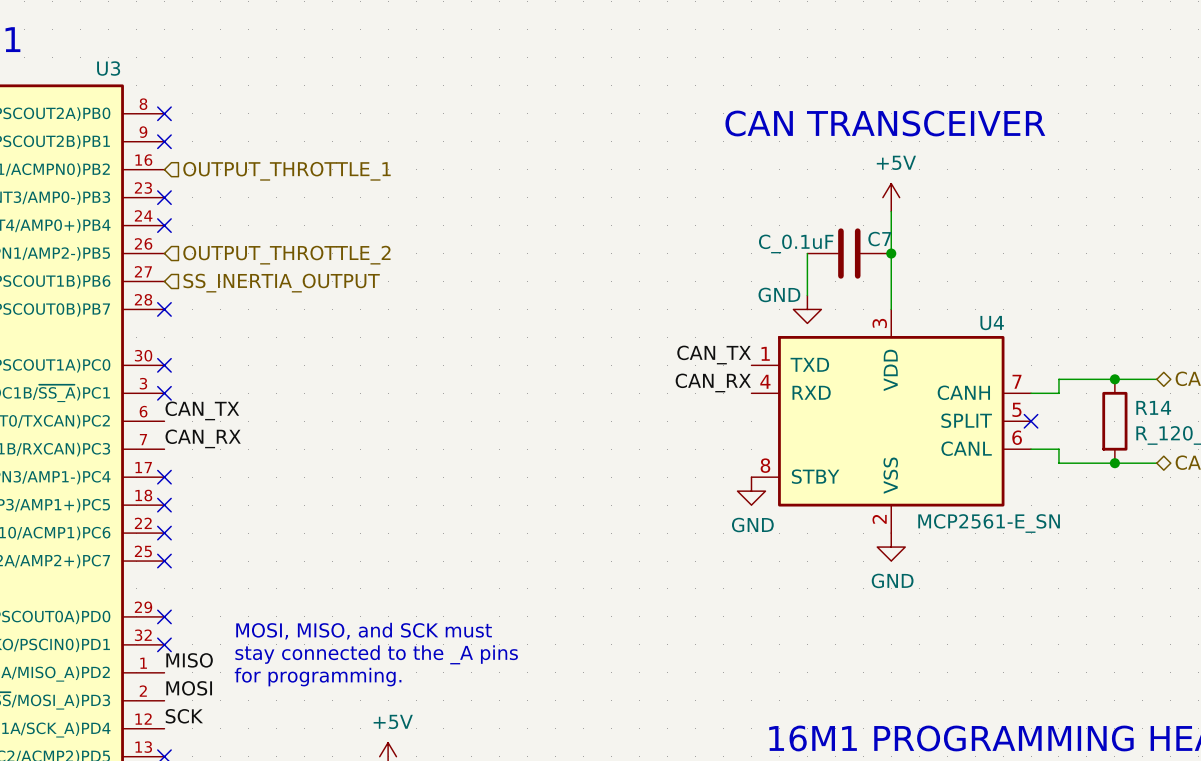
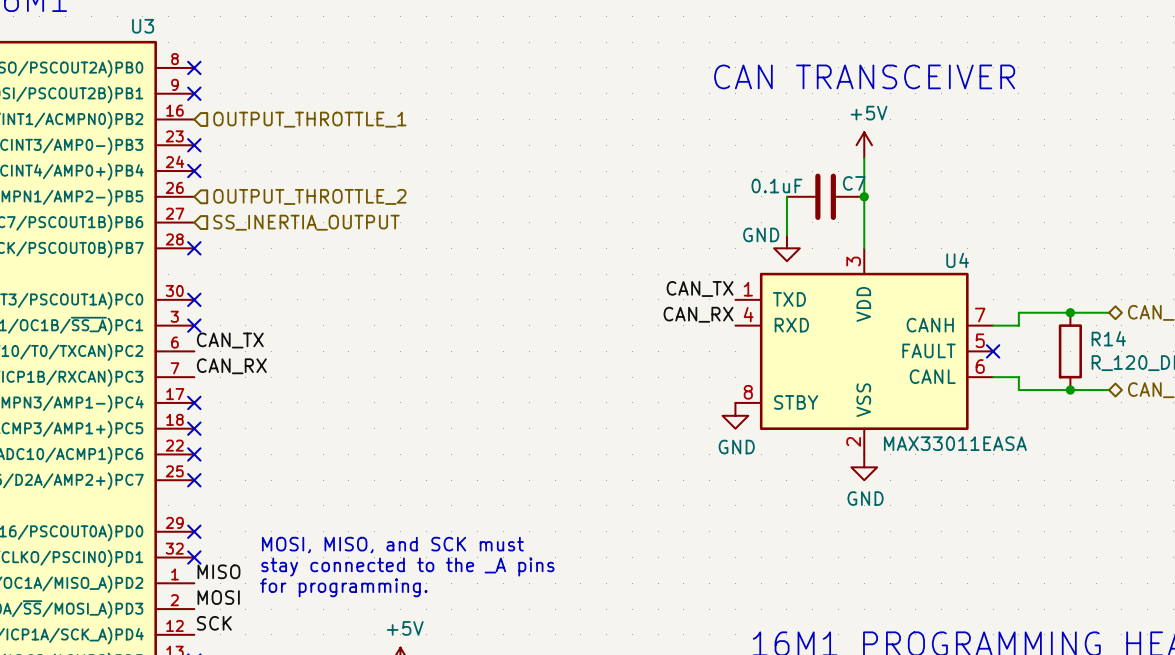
C7 value: C_0.1uF (796, 243) -> 0.1uF (776, 186)
U4 pin name: SPLIT (966, 420) -> FAULT (929, 350)
U4 value: MCP2561-E_SN (989, 523) -> MAX33011EASA (955, 443)

